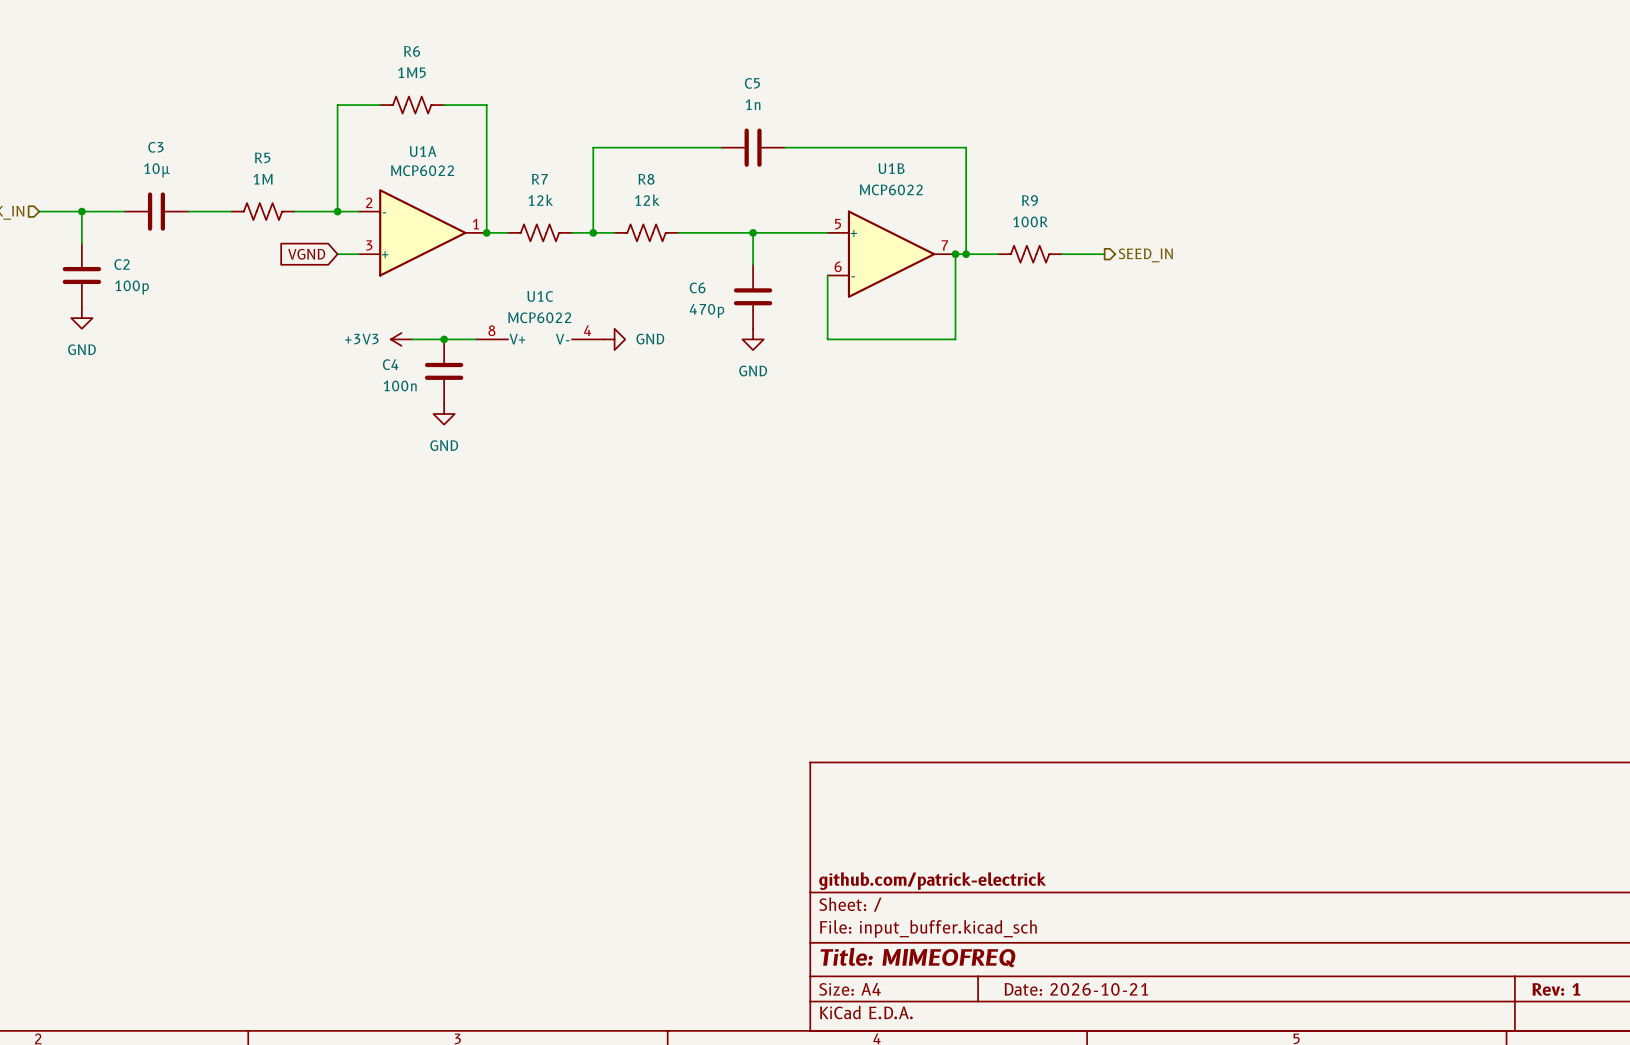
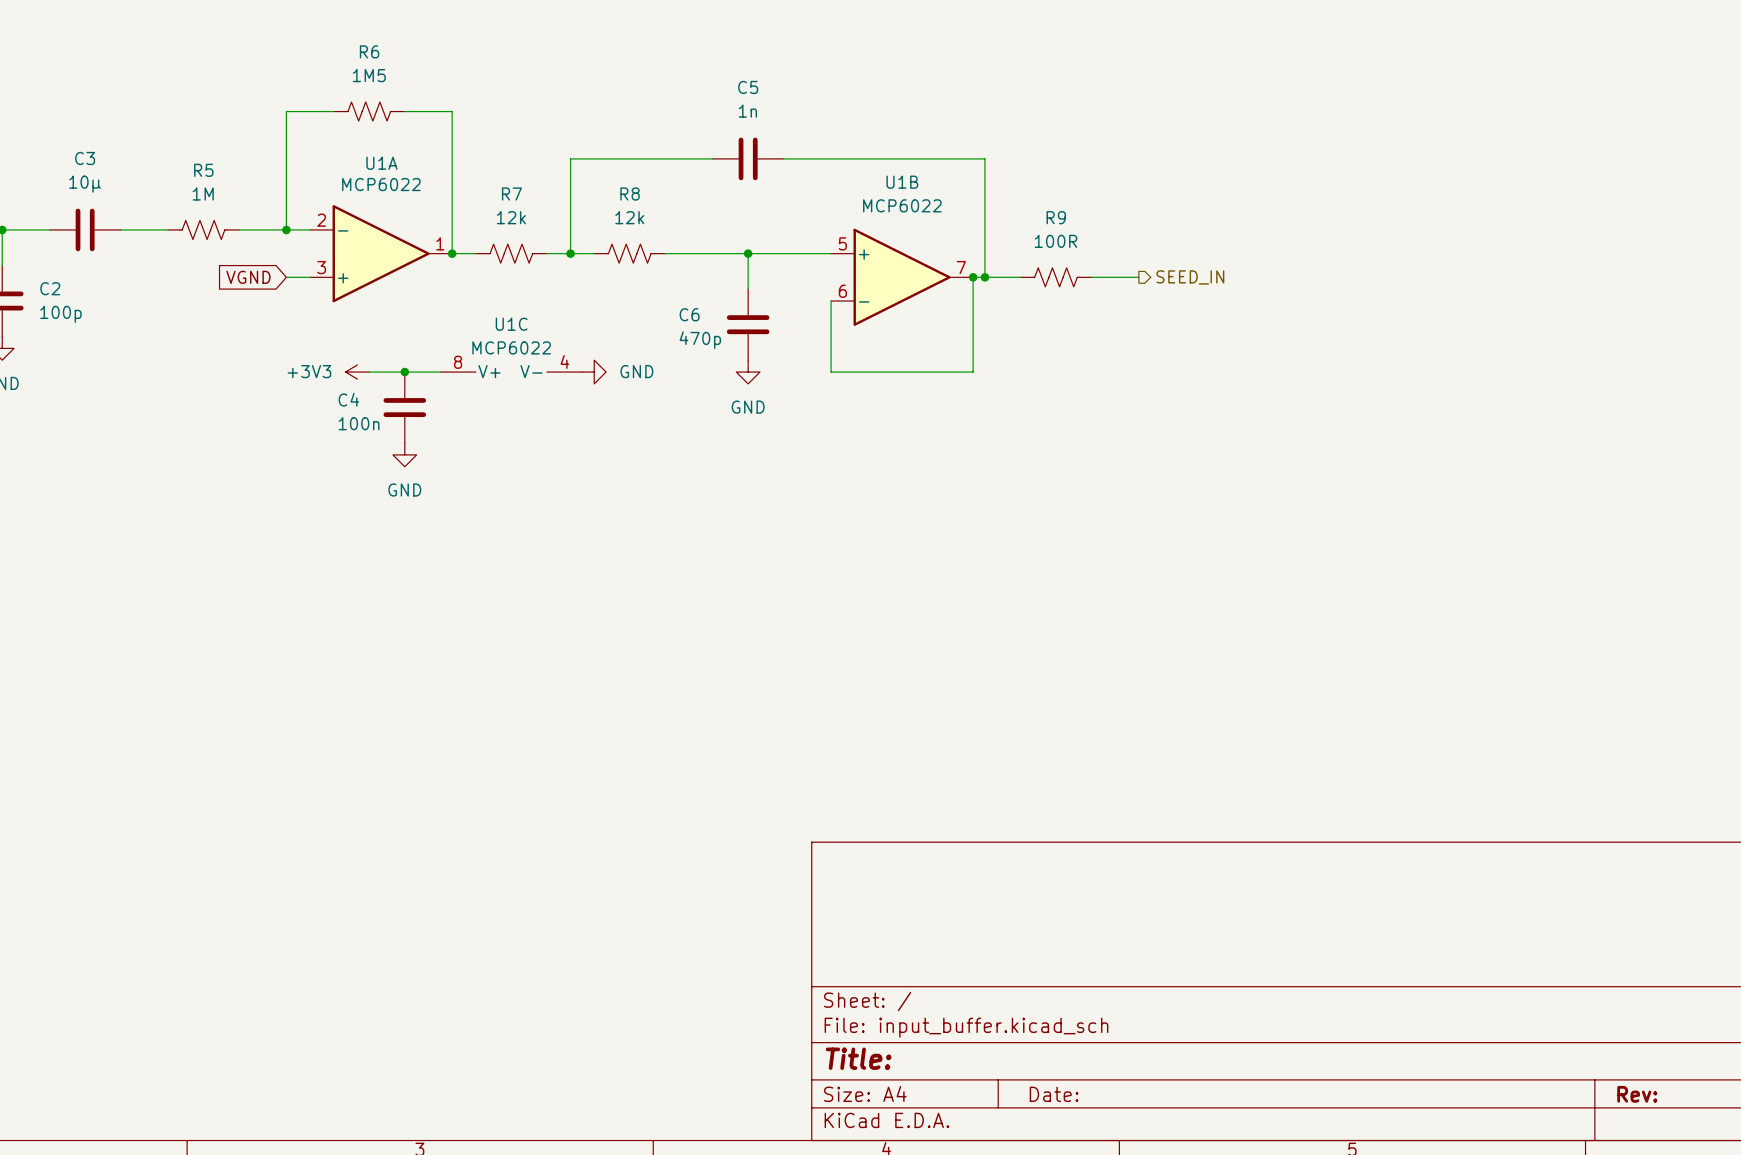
title block: github.com/patrick-electrick (932, 881) -> none
title block: Title: MIMEOFREQ (918, 957) -> Title: (858, 1058)
title block: Date: 2026-10-21 (1076, 989) -> Date: (1054, 1094)
title block: Rev: 1 (1556, 989) -> Rev: (1637, 1094)

